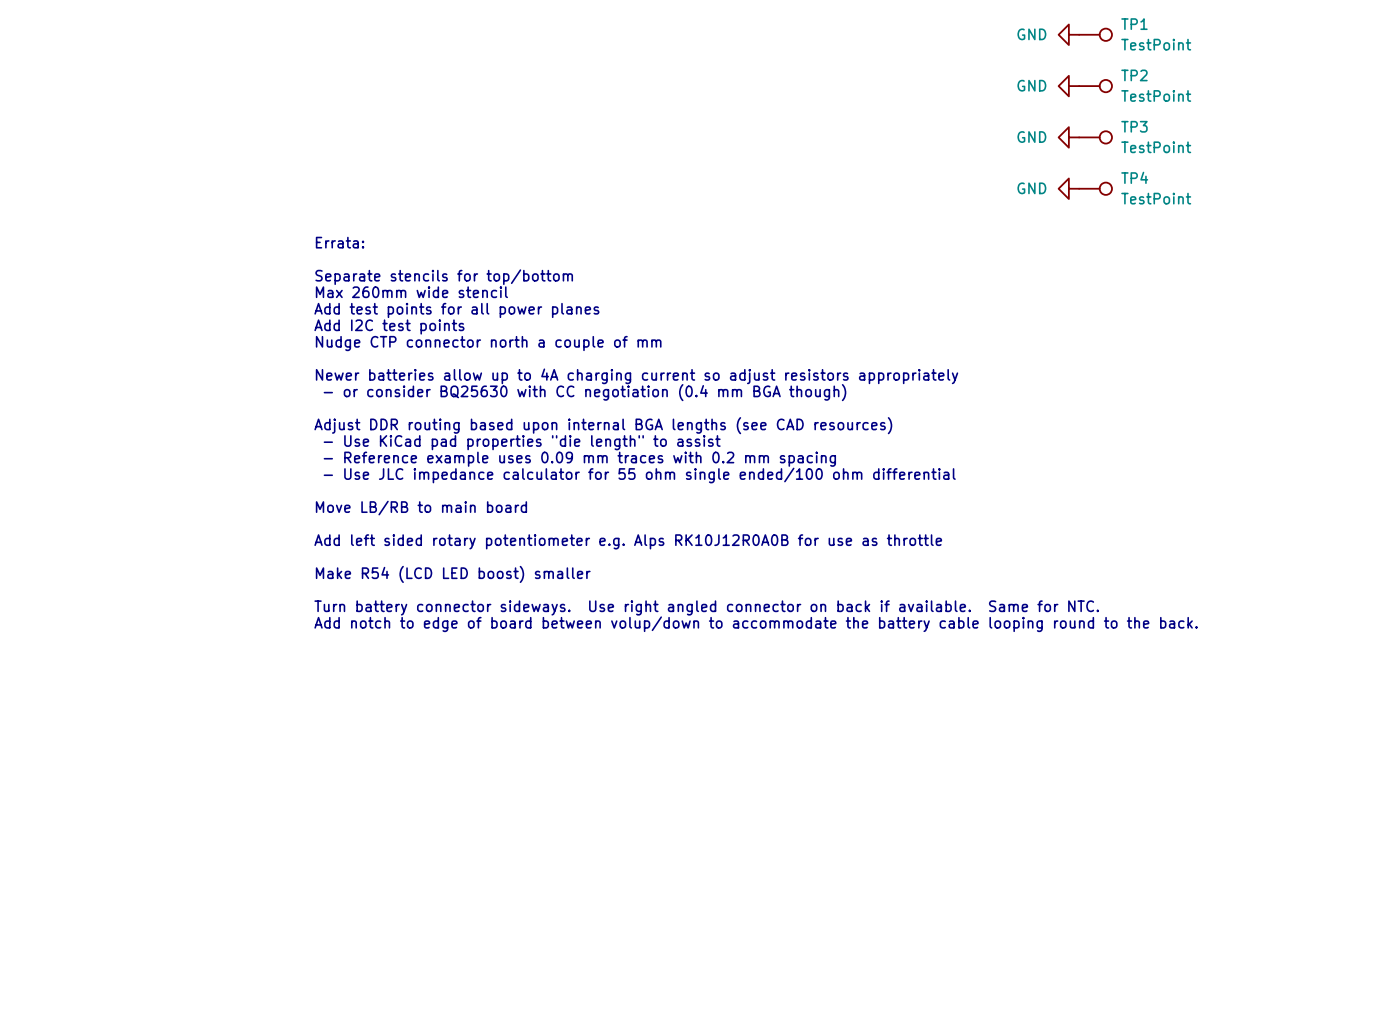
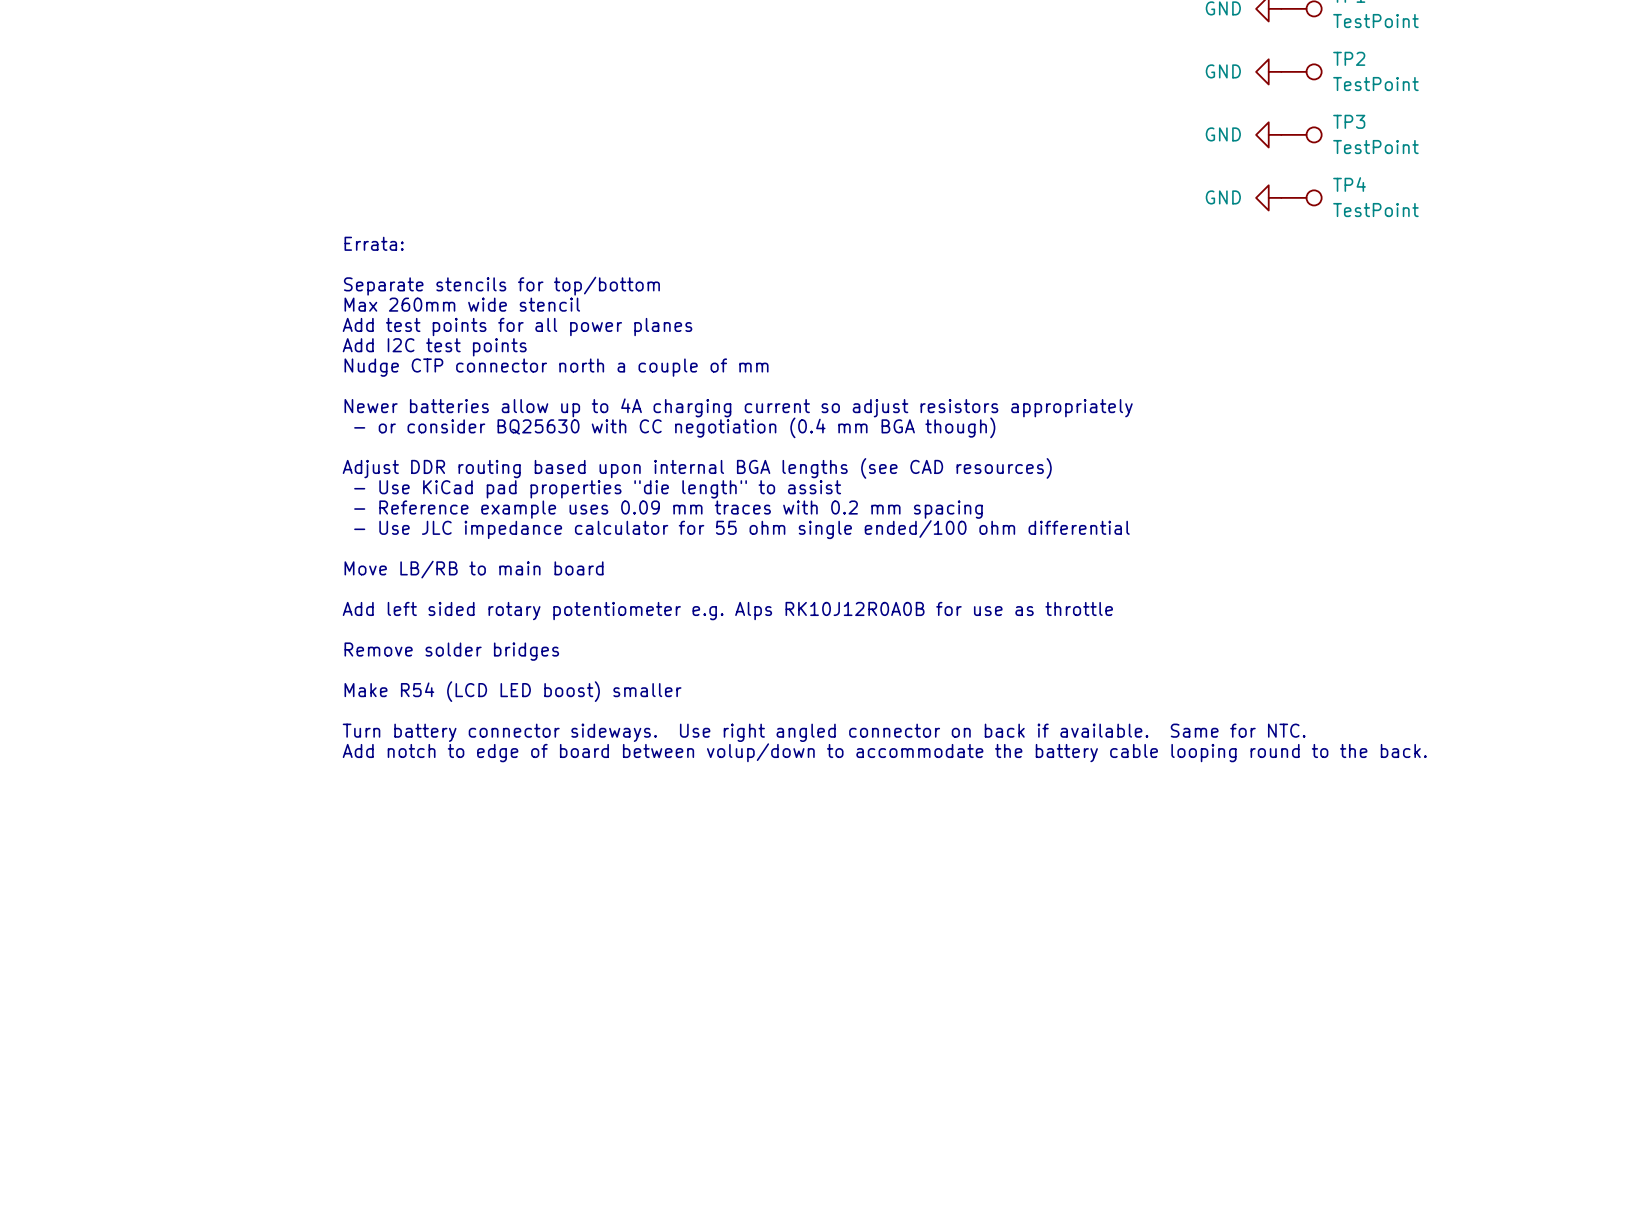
text position: Errata: (340, 242) -> Errata: (374, 243)
text: none -> Separate stencils for top/bottom (501, 286)
text: Separate stencils for top/bottom (444, 277) -> Max 260mm wide stencil (462, 304)
text: Max 260mm wide stencil (411, 292) -> Add test points for all power planes (517, 327)
text: Add test points for all power planes (456, 310) -> Add I2C test points (434, 347)
text: Add I2C test points (389, 326) -> Nudge CTP connector north a couple of mm (556, 367)
text: Nudge CTP connector north a couple of mm (488, 343) -> none
text: none -> Newer batteries allow up to 4A charging current so adjust resistors appropriately (738, 407)
text: Newer batteries allow up to 4A charging current so adjust resistors appropriately (637, 376) -> - or consider BQ25630 with CC negotiation (0.4 mm BGA though) (674, 427)
text: - or consider BQ25630 with CC negotiation (0.4 mm BGA though) (584, 392) -> none
text: none -> Adjust DDR routing based upon internal BGA lengths (see CAD resources) (697, 468)
text: Adjust DDR routing based upon internal BGA lengths (see CAD resources) (603, 425) -> - Use KiCad pad properties "die length" to assist (597, 489)
text: - Use KiCad pad properties "die length" to assist (522, 442) -> - Reference example uses 0.09 mm traces with 0.2 mm spacing (668, 509)
text: - Reference example uses 0.09 mm traces with 0.2 mm spacing (579, 459) -> - Use JLC impedance calculator for 55 ohm single ended/100 ohm differential (741, 529)
text: - Use JLC impedance calculator for 55 ohm single ended/100 ohm differential (639, 475) -> none
text position: Move LB/RB to main board (421, 508) -> Move LB/RB to main board (474, 569)
text position: Add left sided rotary potentiometer e.g. Alps RK10J12R0A0B for use as throttle (628, 541) -> Add left sided rotary potentiometer e.g. Alps RK10J12R0A0B for use as throttle (727, 611)
text: none -> Remove solder bridges (451, 651)
text position: Make R54 (LCD LED boost) smaller (453, 574) -> Make R54 (LCD LED boost) smaller (513, 691)
text: Turn battery connector sideways. Use right angled connector on back if available. Same for NTC. (706, 607) -> none
text: Add notch to edge of board between volup/down to accommodate the battery cable looping round to the back. (756, 624) -> Turn battery connector sideways. Use right angled connector on back if available. Same for NTC. (824, 732)
text: none -> Add notch to edge of board between volup/down to accommodate the battery cable looping round to the back. (884, 752)

